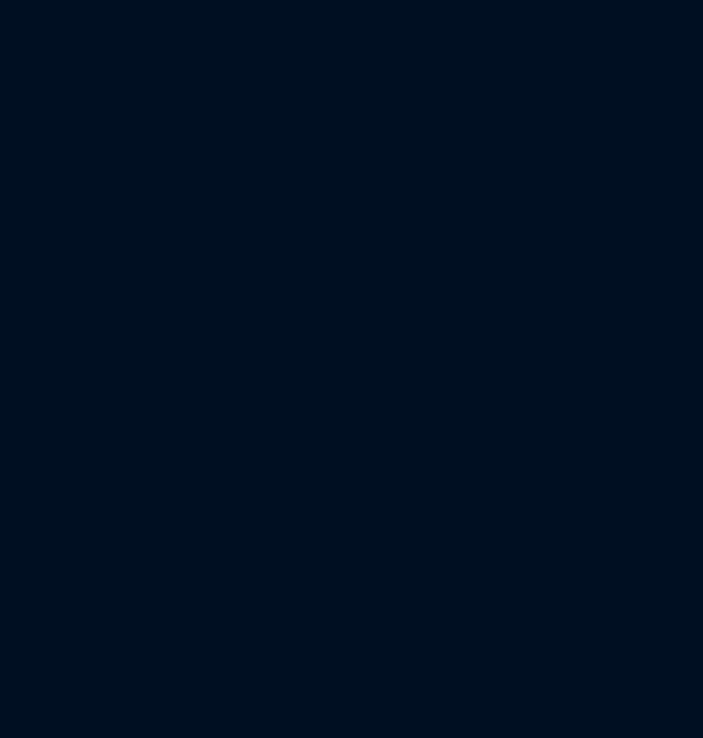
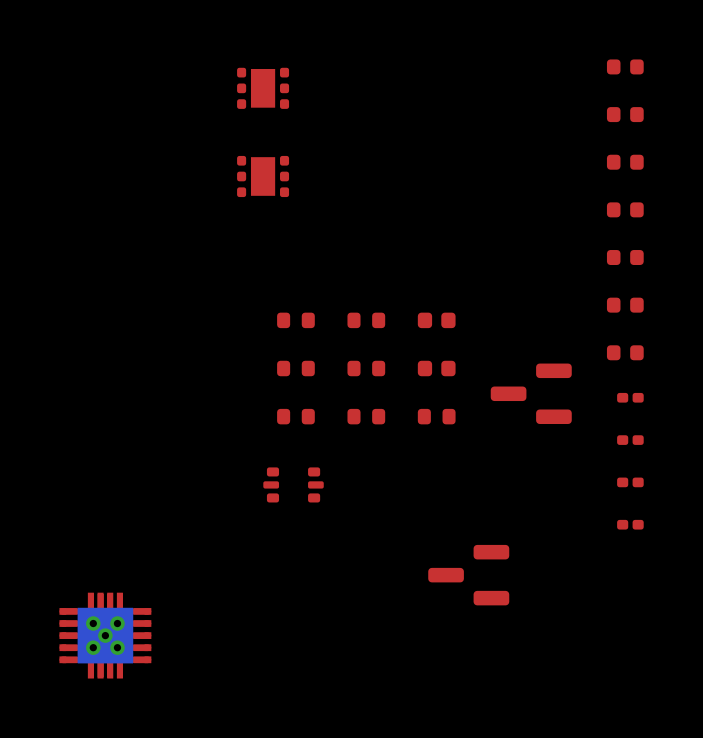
part: none -> (625, 66)
part: none -> (263, 88)
part: none -> (625, 114)
part: none -> (625, 162)
part: none -> (263, 176)
part: none -> (625, 209)
part: none -> (625, 257)
part: none -> (625, 305)
part: none -> (295, 320)
part: none -> (366, 320)
part: none -> (436, 320)
part: none -> (625, 352)
part: none -> (295, 368)
part: none -> (366, 368)
part: none -> (436, 368)
part: none -> (531, 393)
part: none -> (630, 397)
part: none -> (295, 416)
part: none -> (366, 416)
part: none -> (436, 416)
part: none -> (630, 440)
part: none -> (630, 482)
part: none -> (293, 484)
part: none -> (630, 524)
part: none -> (468, 575)
part: none -> (105, 635)

